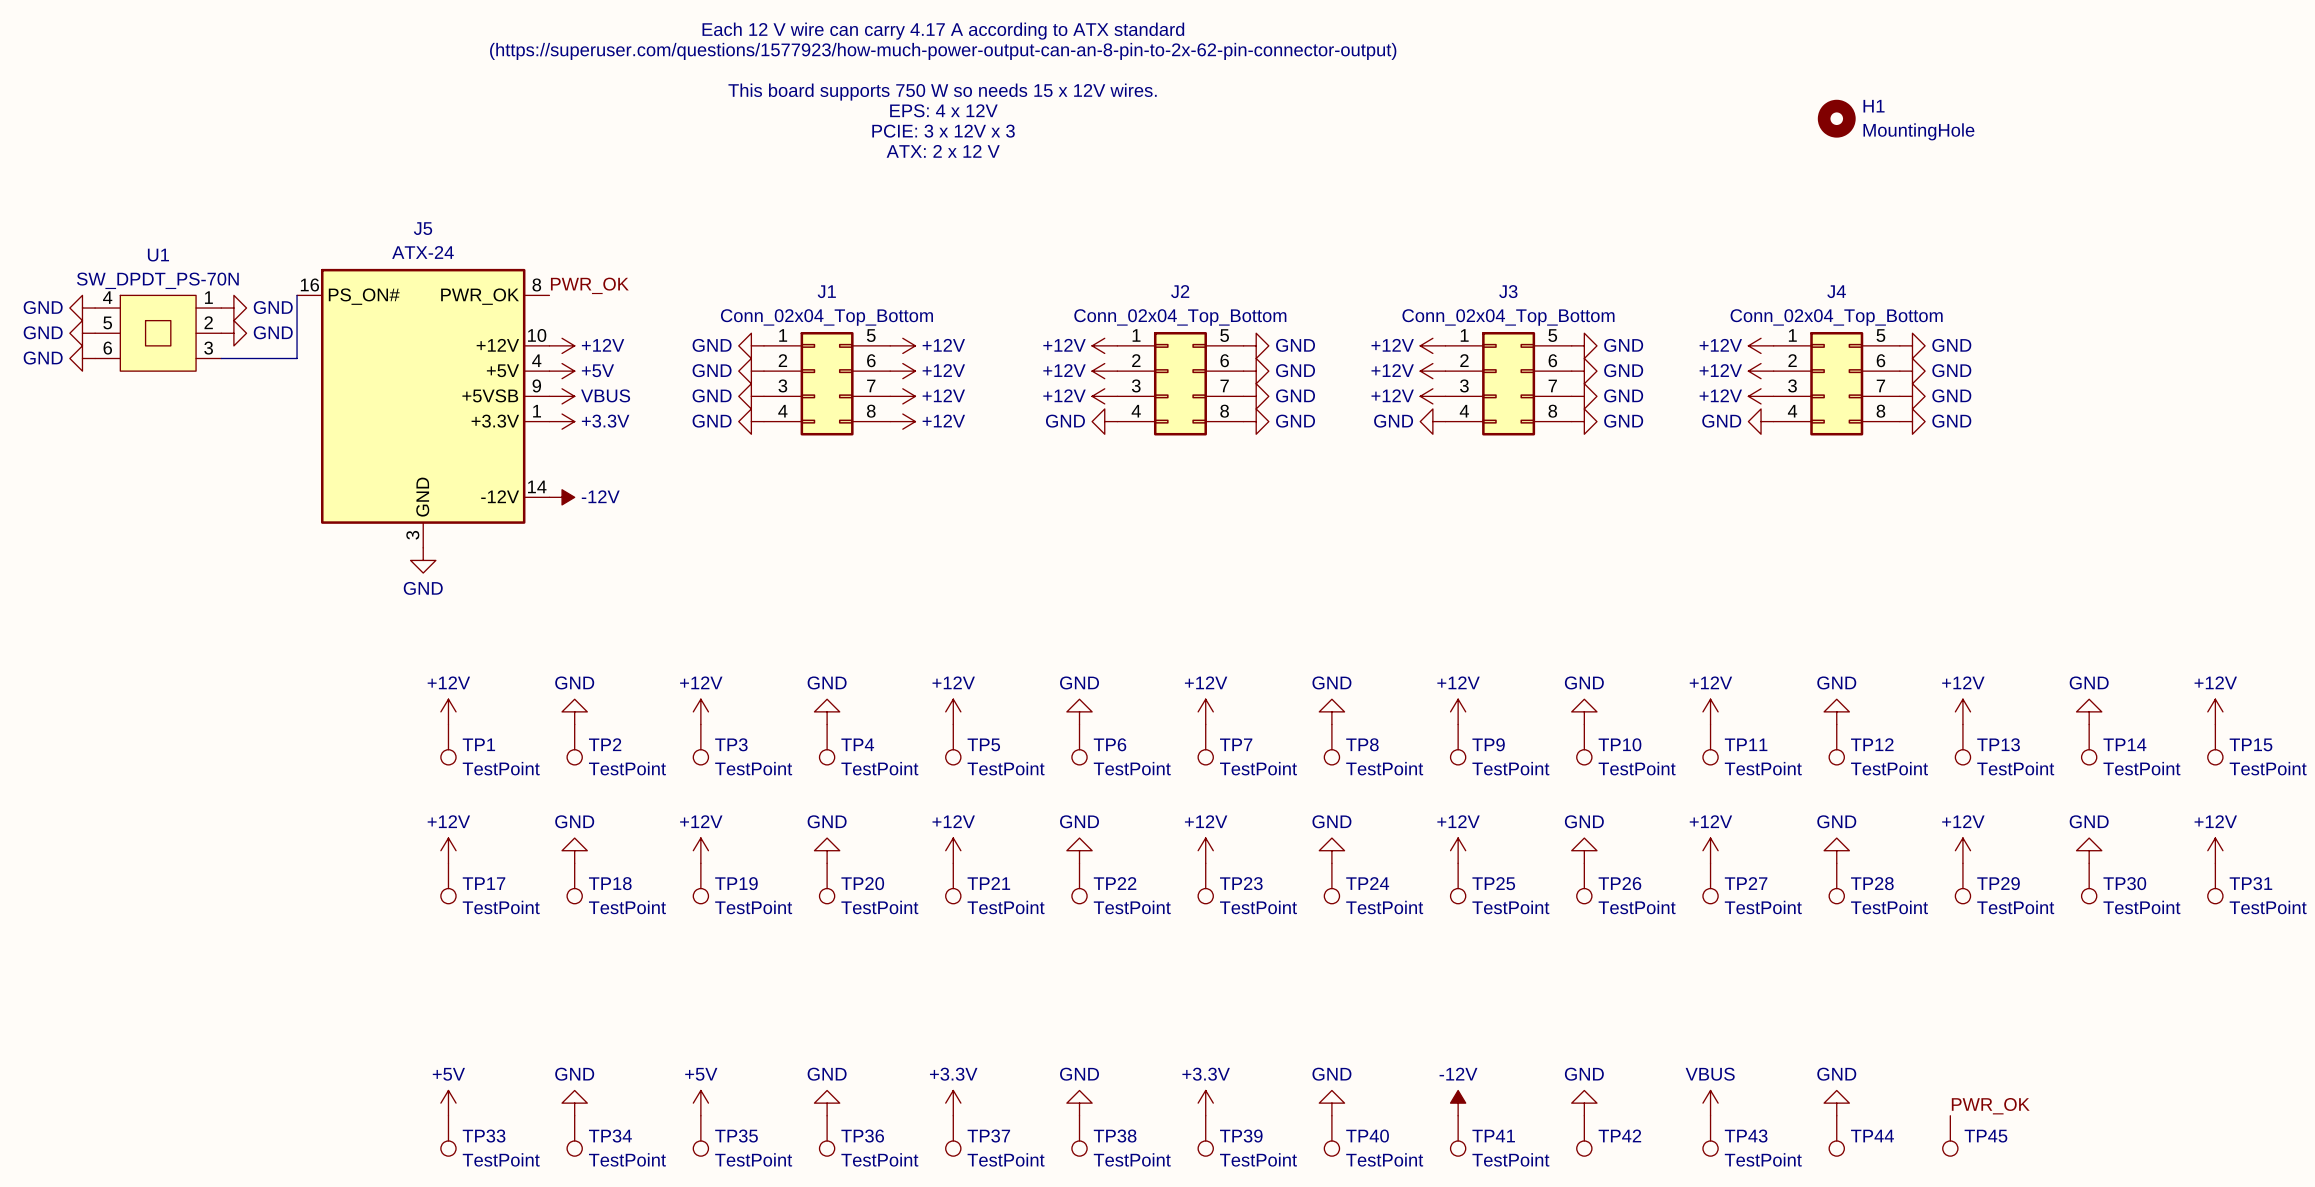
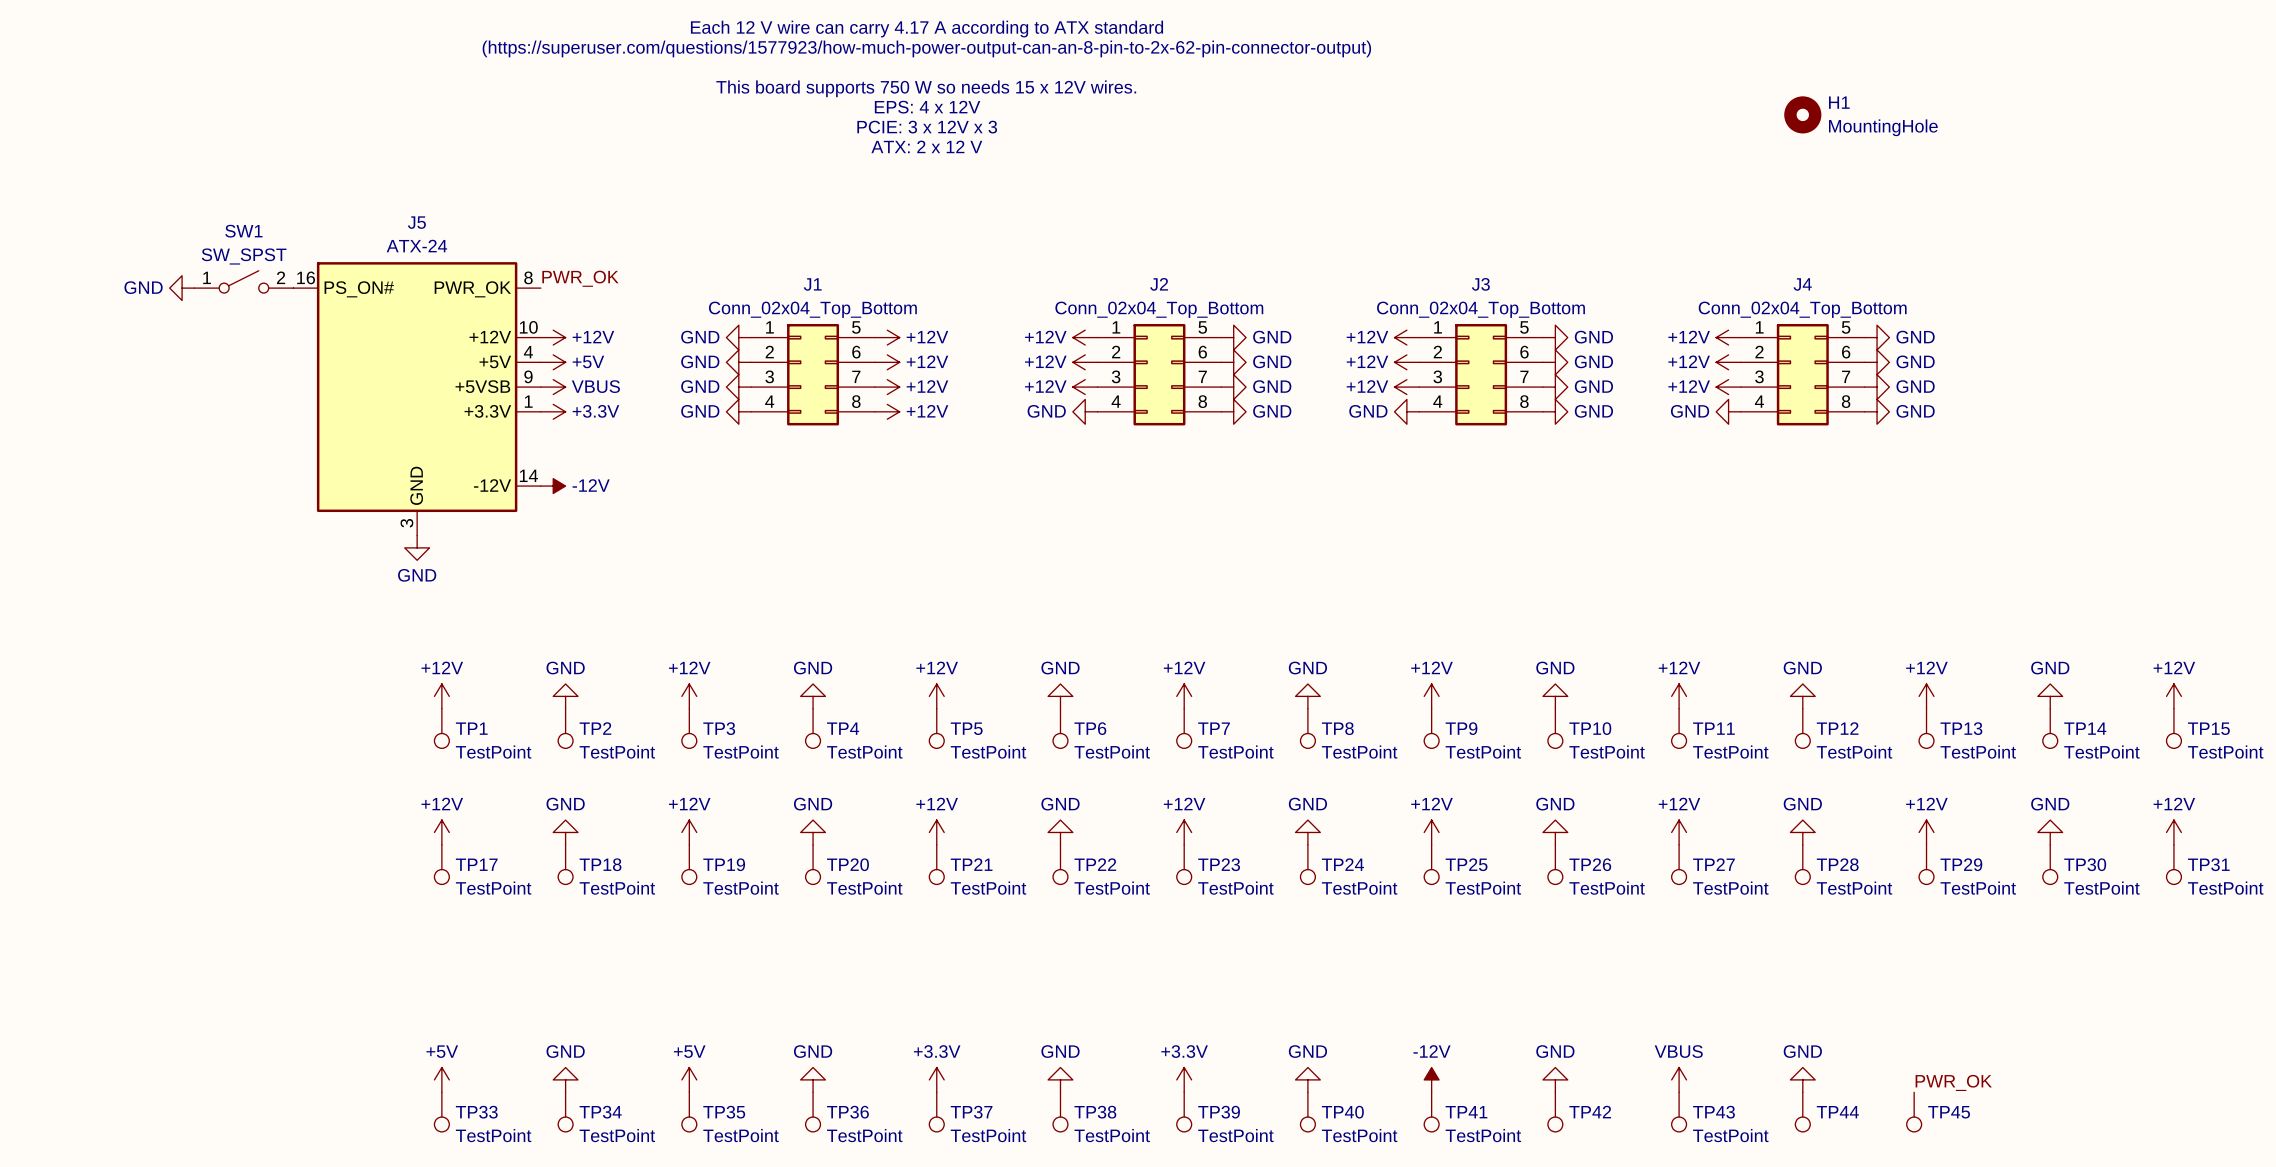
SW1: none -> SW_SPST (243, 281)
power symbol: none -> GND (182, 288)
wire: (297, 295) (297, 358) (221, 358) -> none
power symbol: GND (82, 308) -> none
power symbol: GND (233, 308) -> none
power symbol: GND (82, 333) -> none
U1: SW_DPDT_PS-70N (158, 333) -> none
power symbol: GND (233, 333) -> none
power symbol: GND (82, 358) -> none

